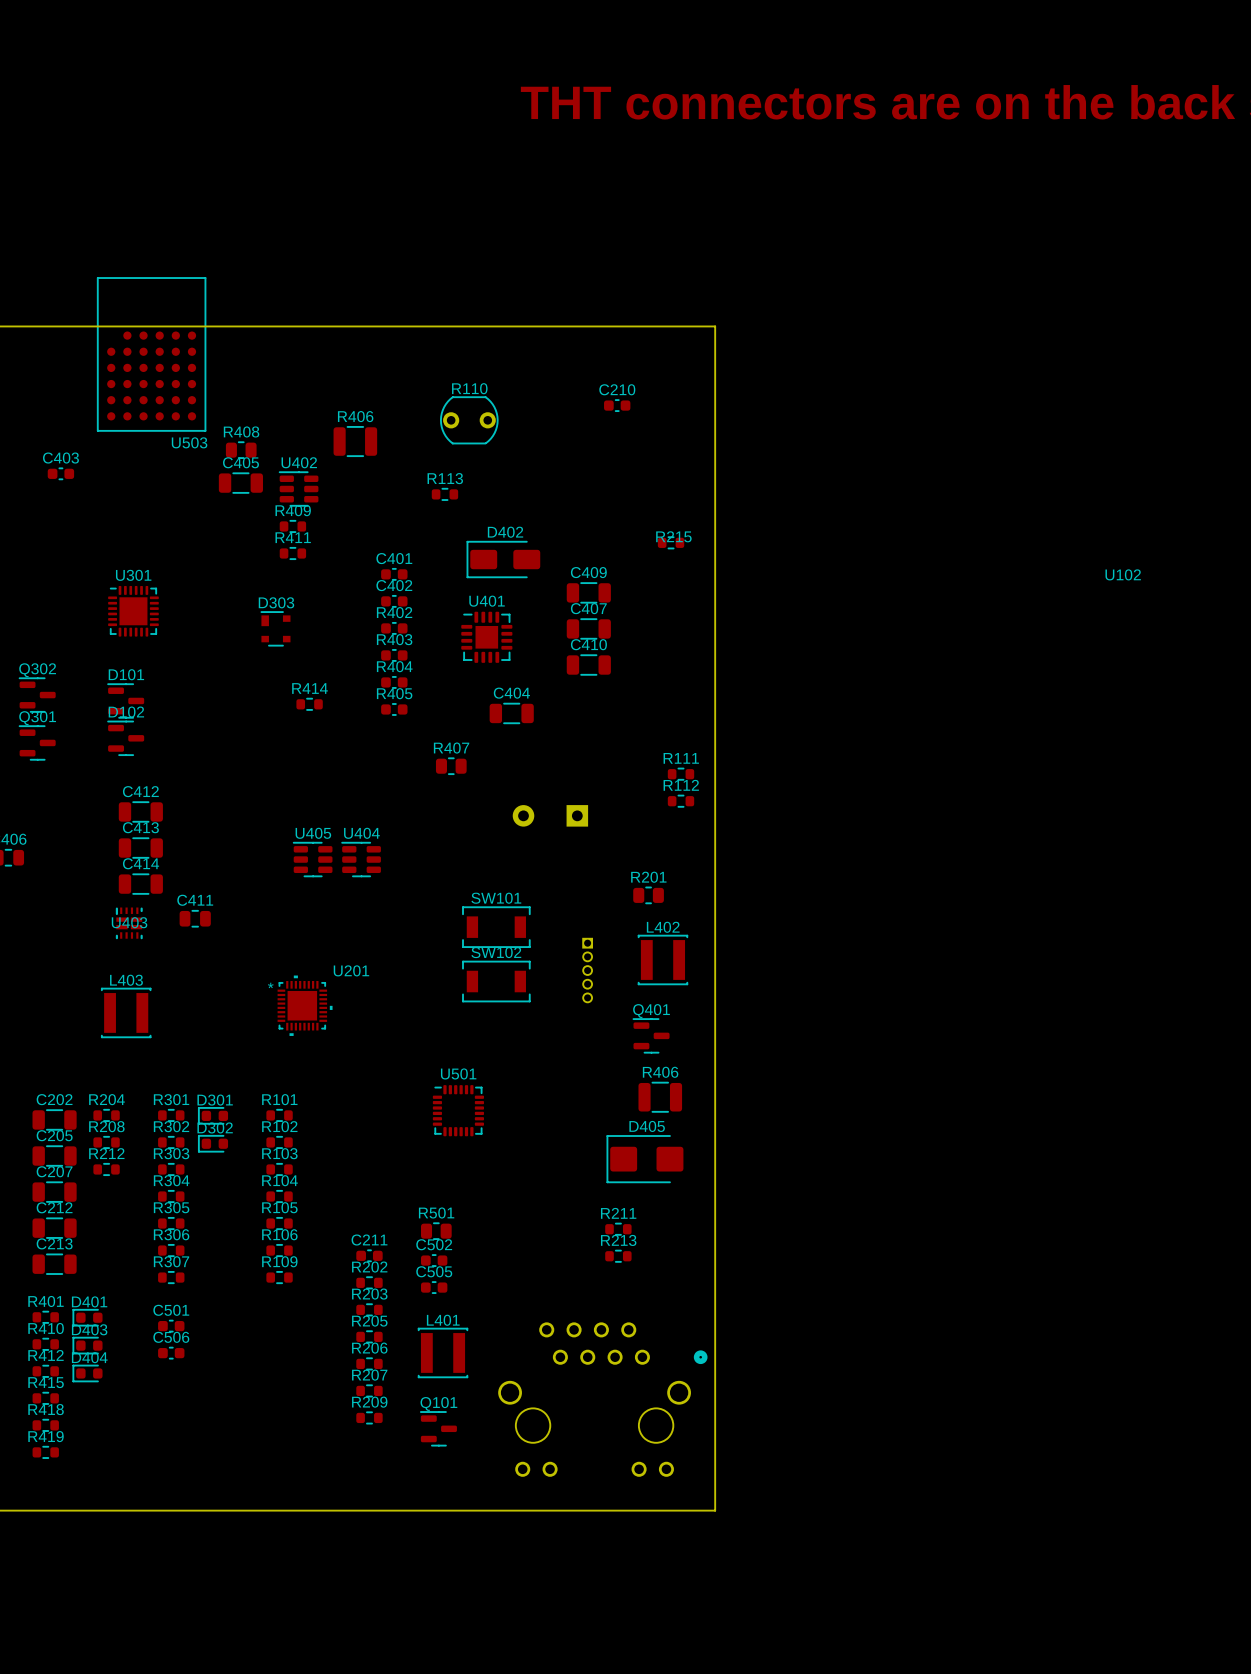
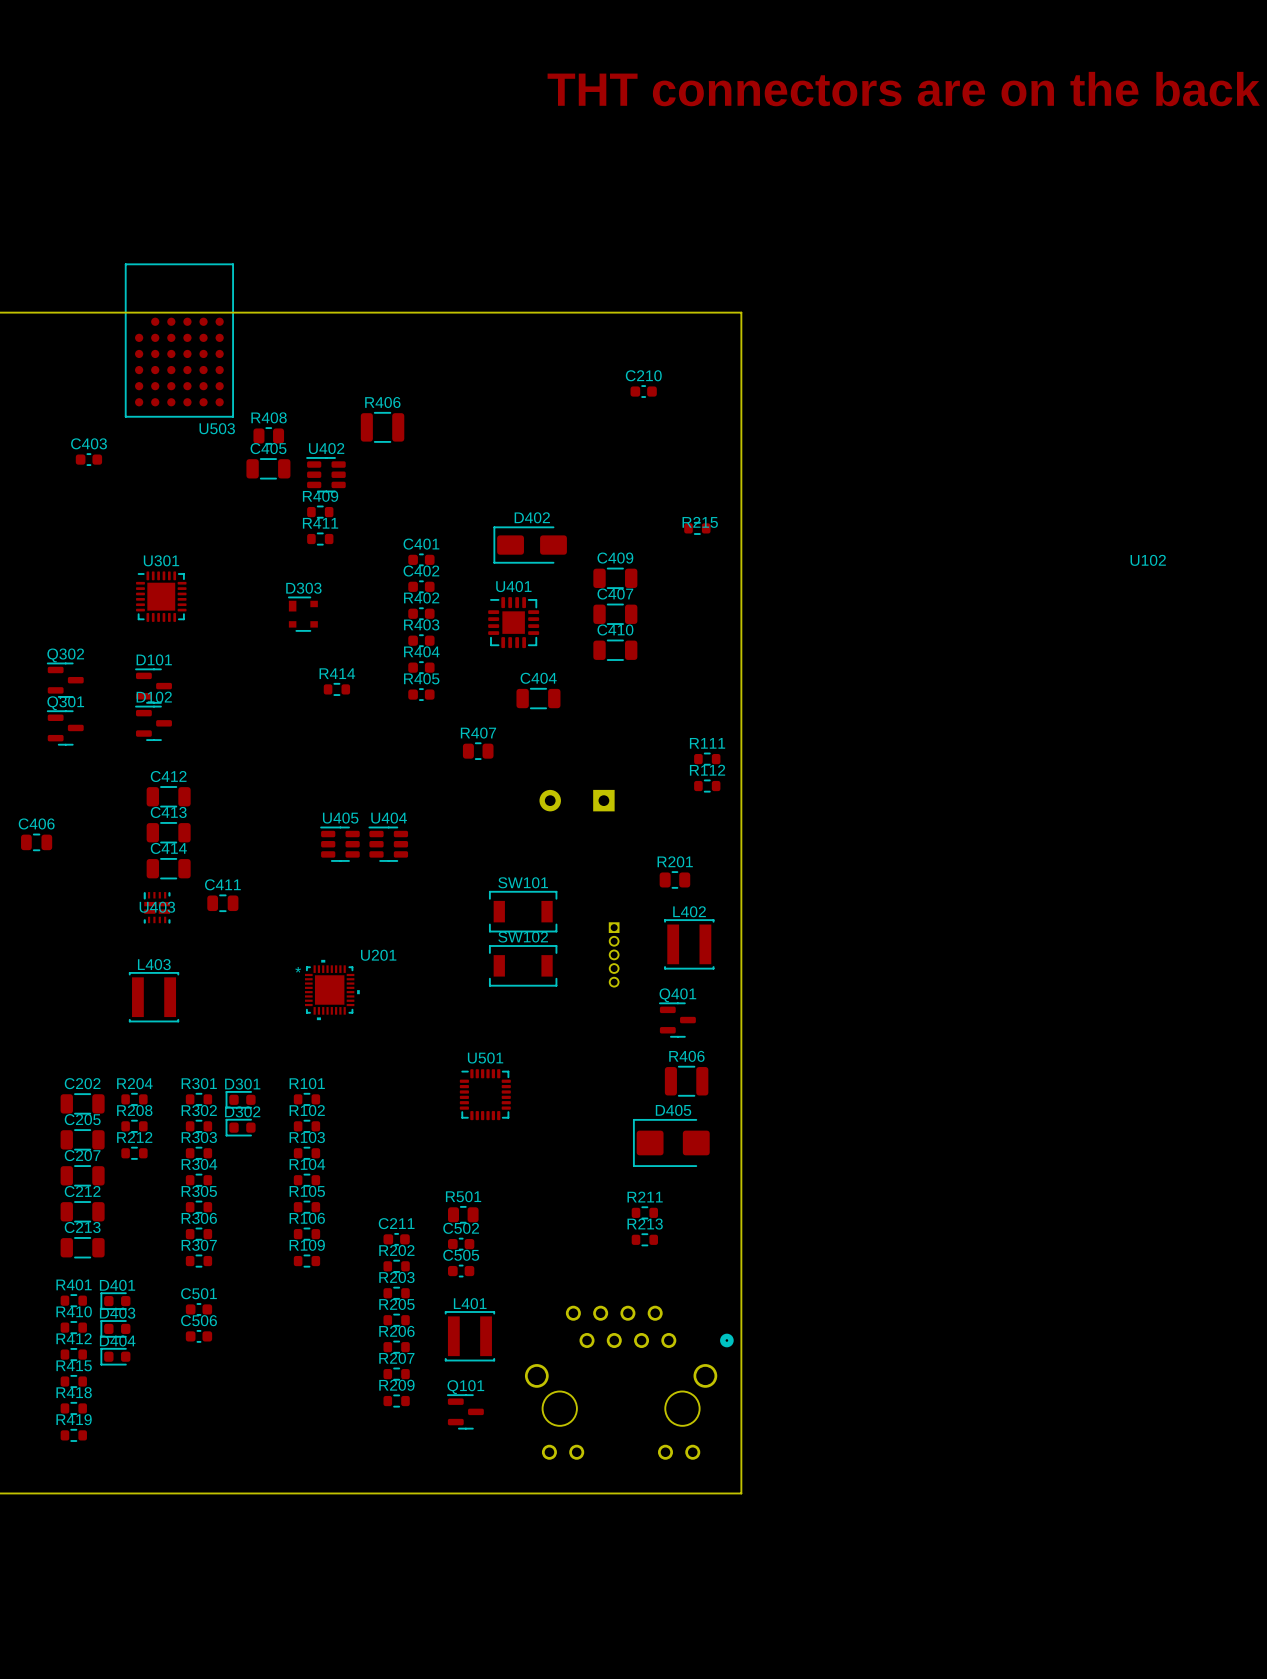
R110: (469, 420) -> none
R113: (444, 494) -> none

